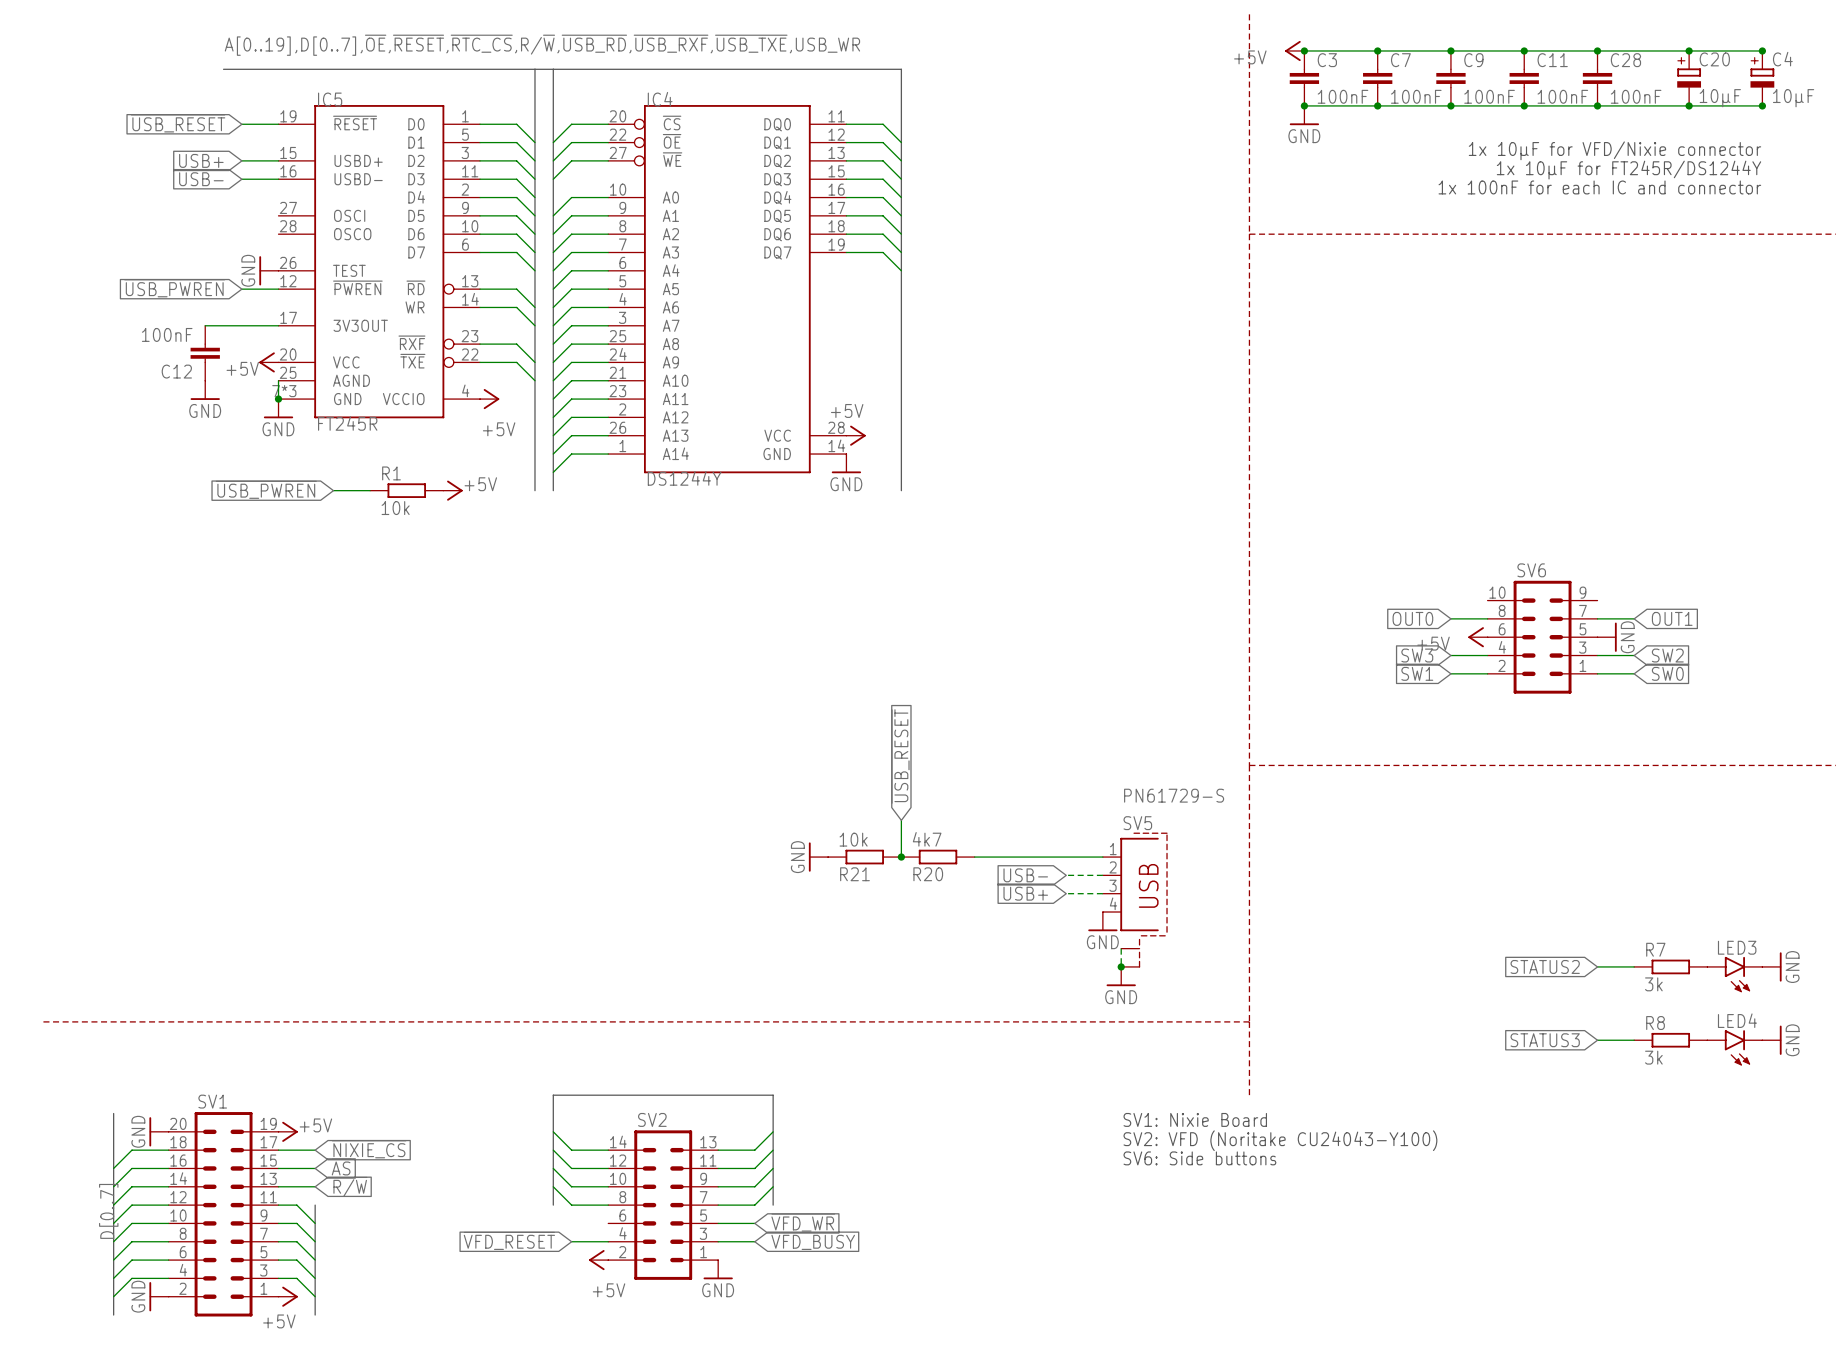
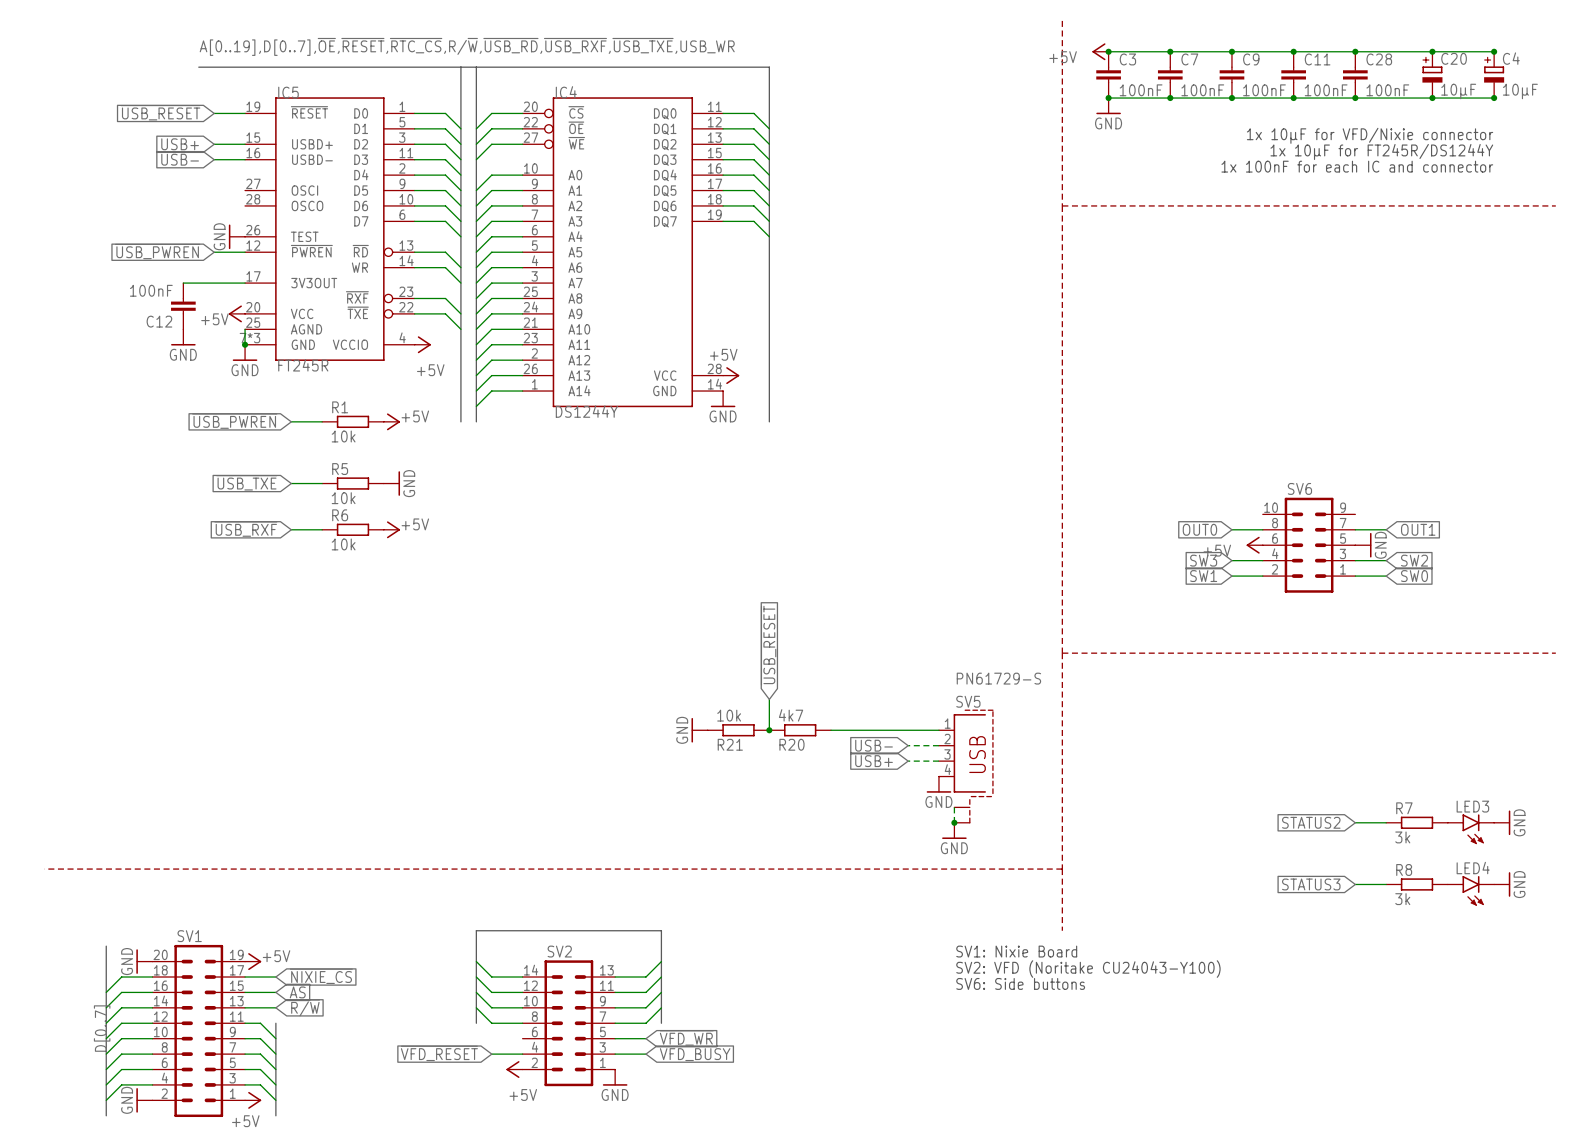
global label: none -> ~{USB_TXE} (246, 482)
wire: none -> (291, 483) (322, 483)
R5: none -> 10k (352, 483)
power symbol: none -> GND (391, 483)
global label: none -> ~{USB_RXF} (245, 529)
wire: none -> (291, 529) (322, 529)
R6: none -> 10k (352, 529)
power symbol: none -> +5V (391, 529)

